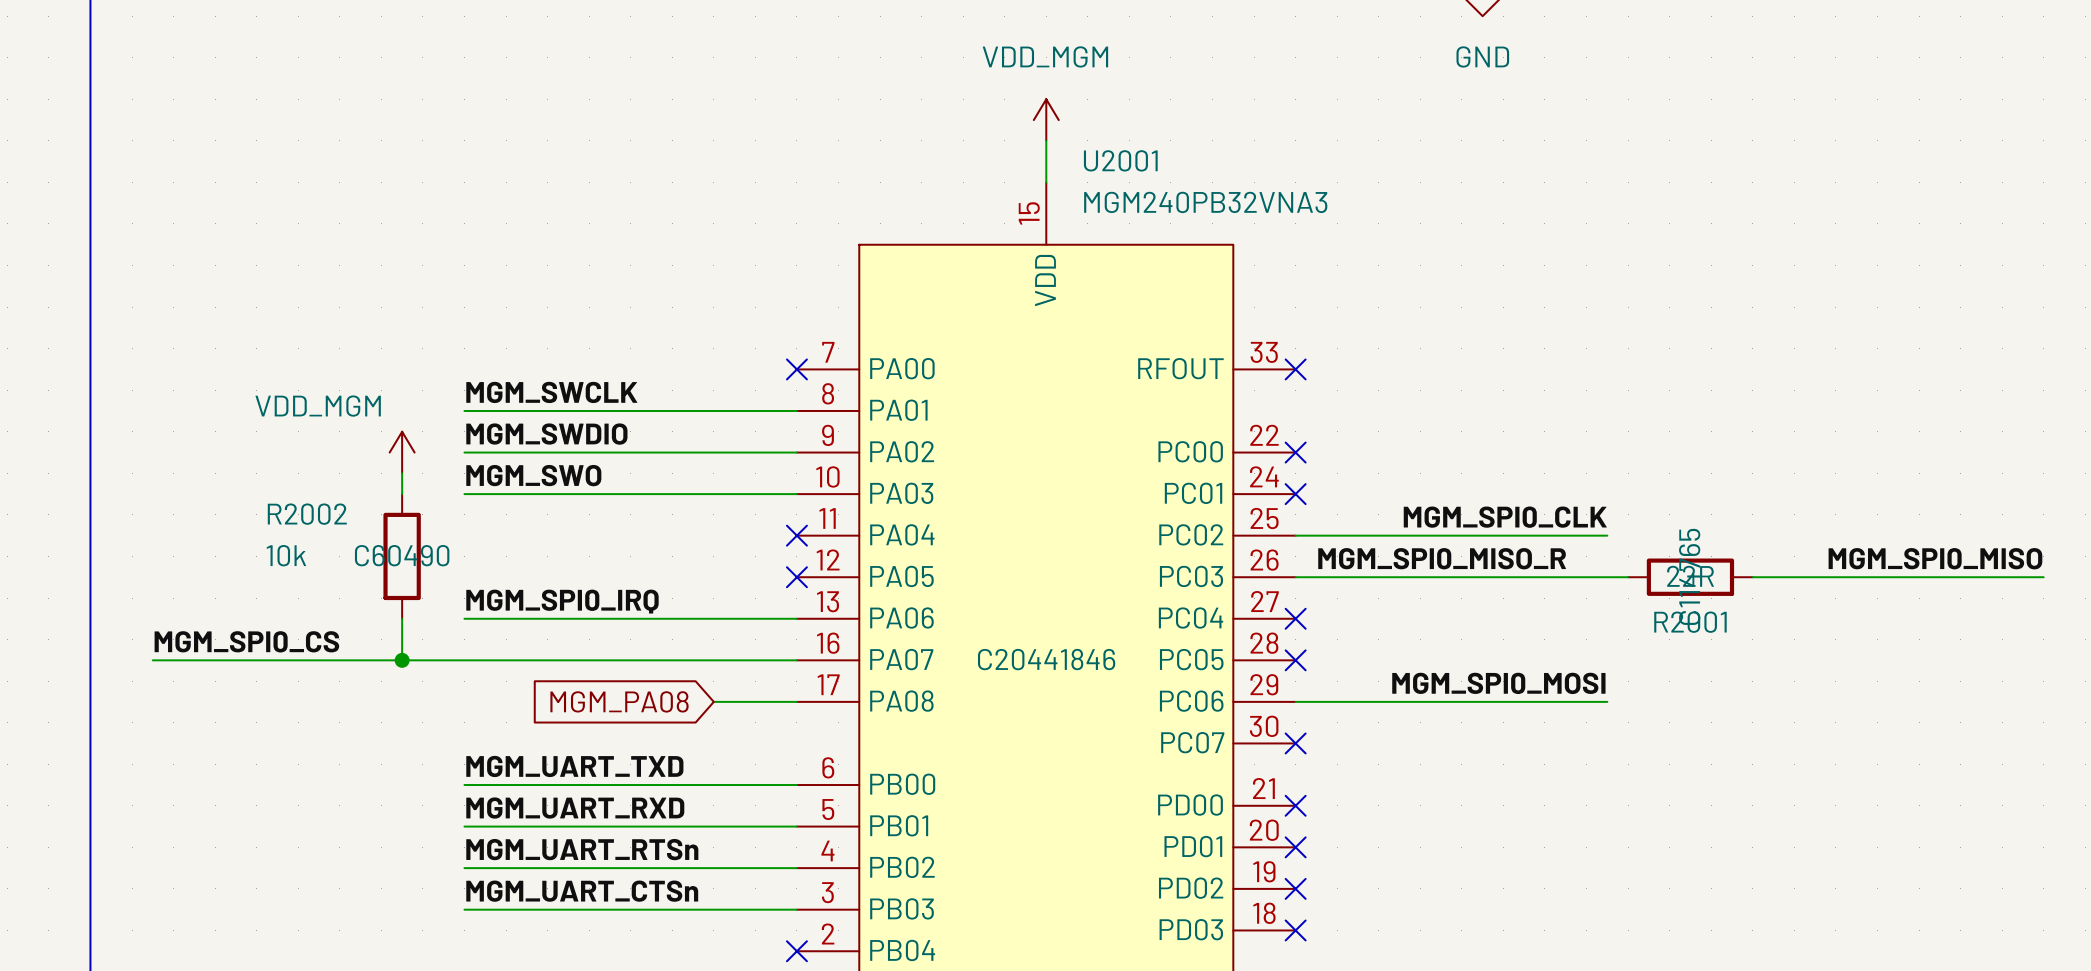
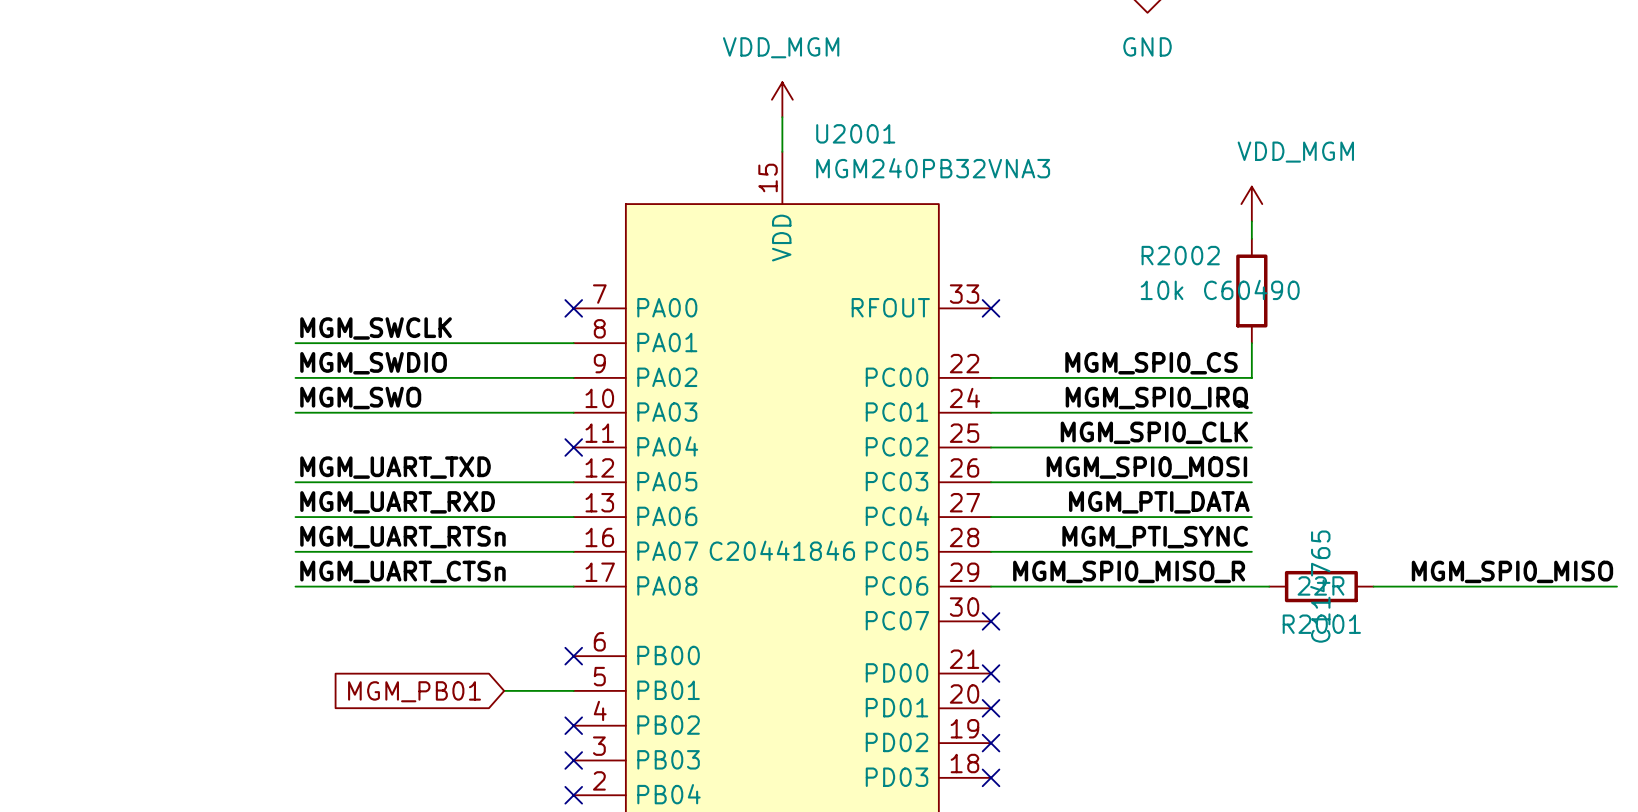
power symbol: none -> VDD_MGM (1251, 204)
wire: none -> (1251, 221) (1251, 238)
wire: none -> (1251, 343) (1251, 377) (991, 377)
label: none -> MGM_SPI0_CS (1151, 363)
power symbol: VDD_MGM (402, 452) -> none
no-connect mark: (1295, 452) -> none
wire: (402, 473) (402, 494) -> none
label: none -> MGM_SPI0_IRQ (1157, 398)
wire: none -> (991, 412) (1251, 412)
no-connect mark: (1295, 494) -> none
R2002 position: (402, 556) -> (1251, 291)
label position: MGM_SPI0_MISO_R (1442, 558) -> MGM_SPI0_MISO_R (1129, 571)
label position: MGM_SPI0_MISO (1935, 558) -> MGM_SPI0_MISO (1512, 571)
no-connect mark: (796, 577) -> none
wire: (1607, 577) (1628, 577) -> (1251, 586) (1269, 586)
R2001 position: (1690, 577) -> (1321, 586)
wire: (1752, 577) (2043, 577) -> (1373, 586) (1617, 586)
label: none -> MGM_PTI_DATA (1159, 502)
label: MGM_SPI0_IRQ (562, 601) -> MGM_UART_RXD (397, 502)
wire: (402, 618) (402, 660) -> none
wire: none -> (991, 517) (1251, 517)
no-connect mark: (1295, 618) -> none
label: MGM_SPI0_CS (246, 641) -> none
label: none -> MGM_PTI_SYNC (1155, 537)
wire: (152, 660) (464, 660) -> none
junction: (402, 660) -> none
wire: none -> (991, 551) (1251, 551)
no-connect mark: (1295, 660) -> none
label position: MGM_SPI0_MOSI (1498, 683) -> MGM_SPI0_MOSI (1146, 467)
global label: MGM_PA08 (619, 701) -> none
label position: MGM_UART_TXD (574, 766) -> MGM_UART_TXD (395, 467)
wire: (464, 785) (796, 785) -> (295, 482) (573, 482)
no-connect mark: none -> (573, 656)
label: MGM_UART_RXD (575, 808) -> none
wire: (464, 826) (713, 826) -> (295, 586) (504, 586)
global label: none -> MGM_PB01 (414, 691)
label position: MGM_UART_RTSn (582, 849) -> MGM_UART_RTSn (402, 537)
wire: (464, 868) (796, 868) -> none
no-connect mark: none -> (573, 725)
label position: MGM_UART_CTSn (582, 891) -> MGM_UART_CTSn (402, 571)
wire: (464, 909) (796, 909) -> none
no-connect mark: none -> (573, 760)

